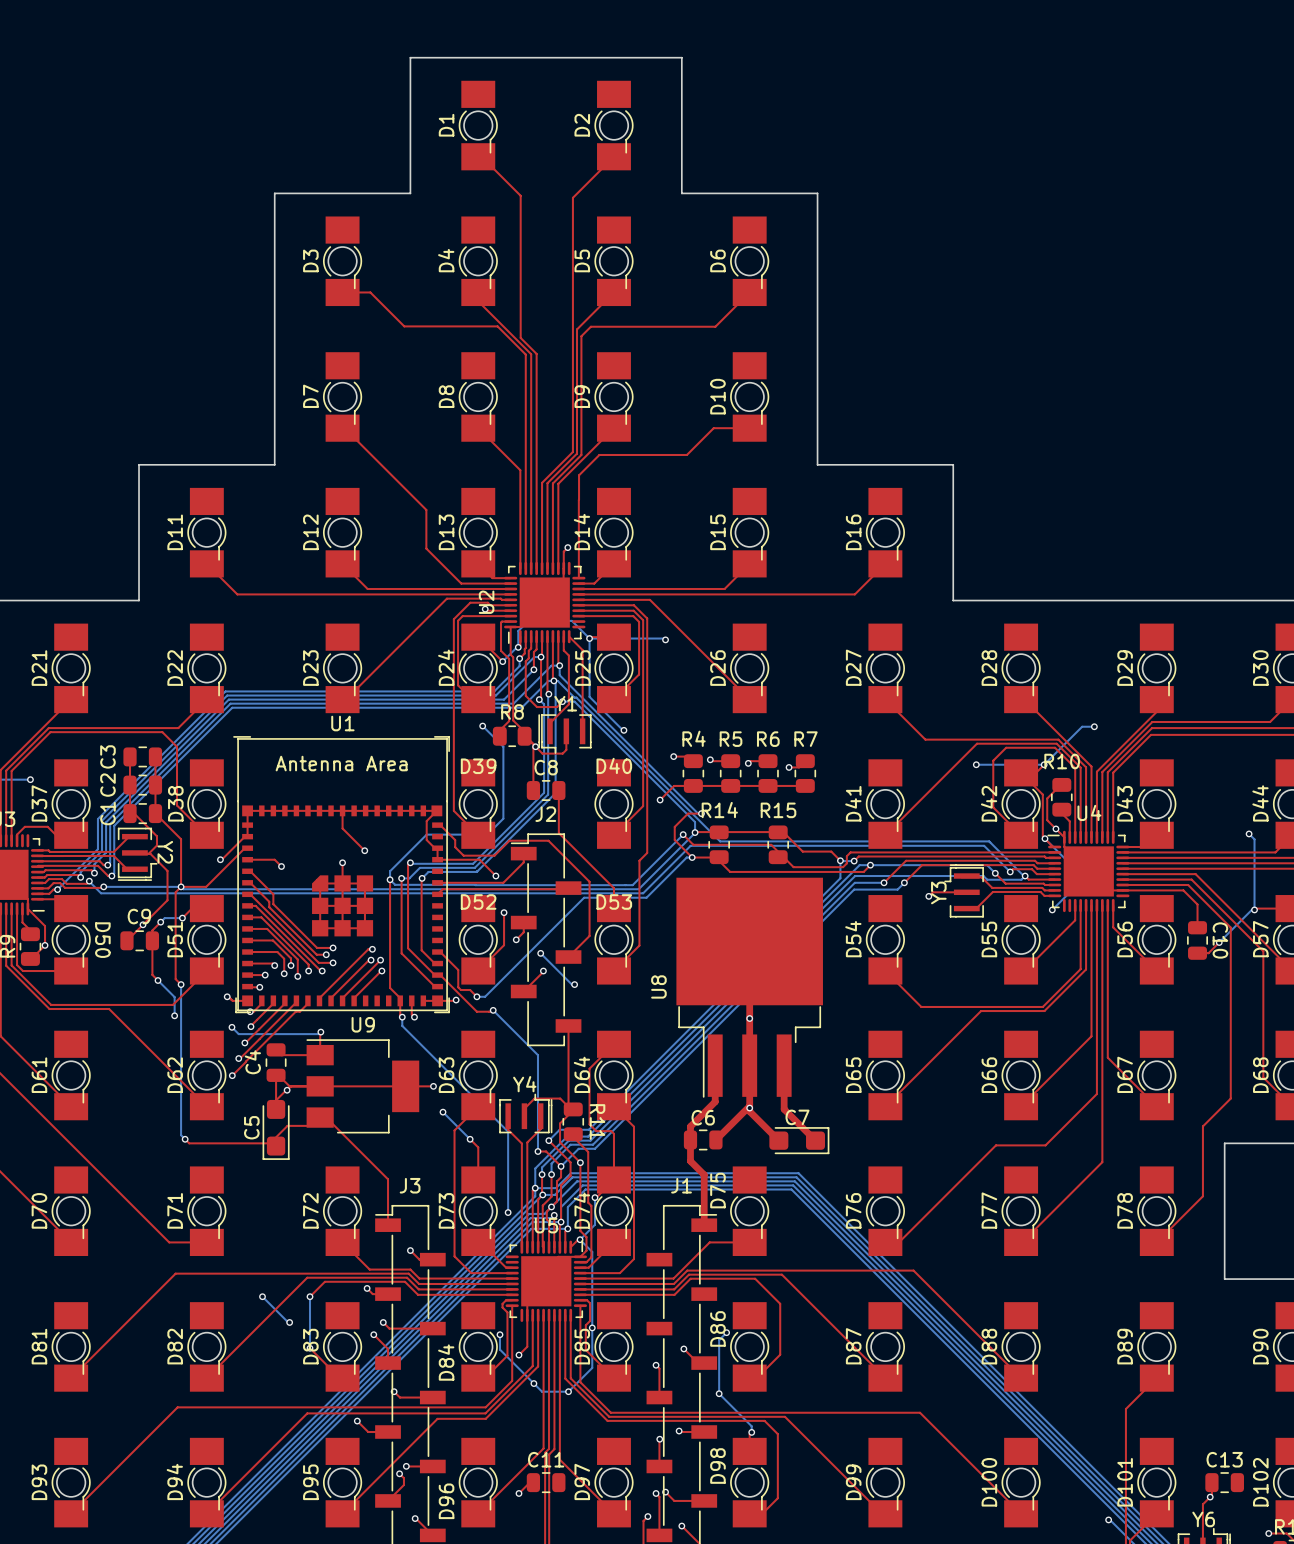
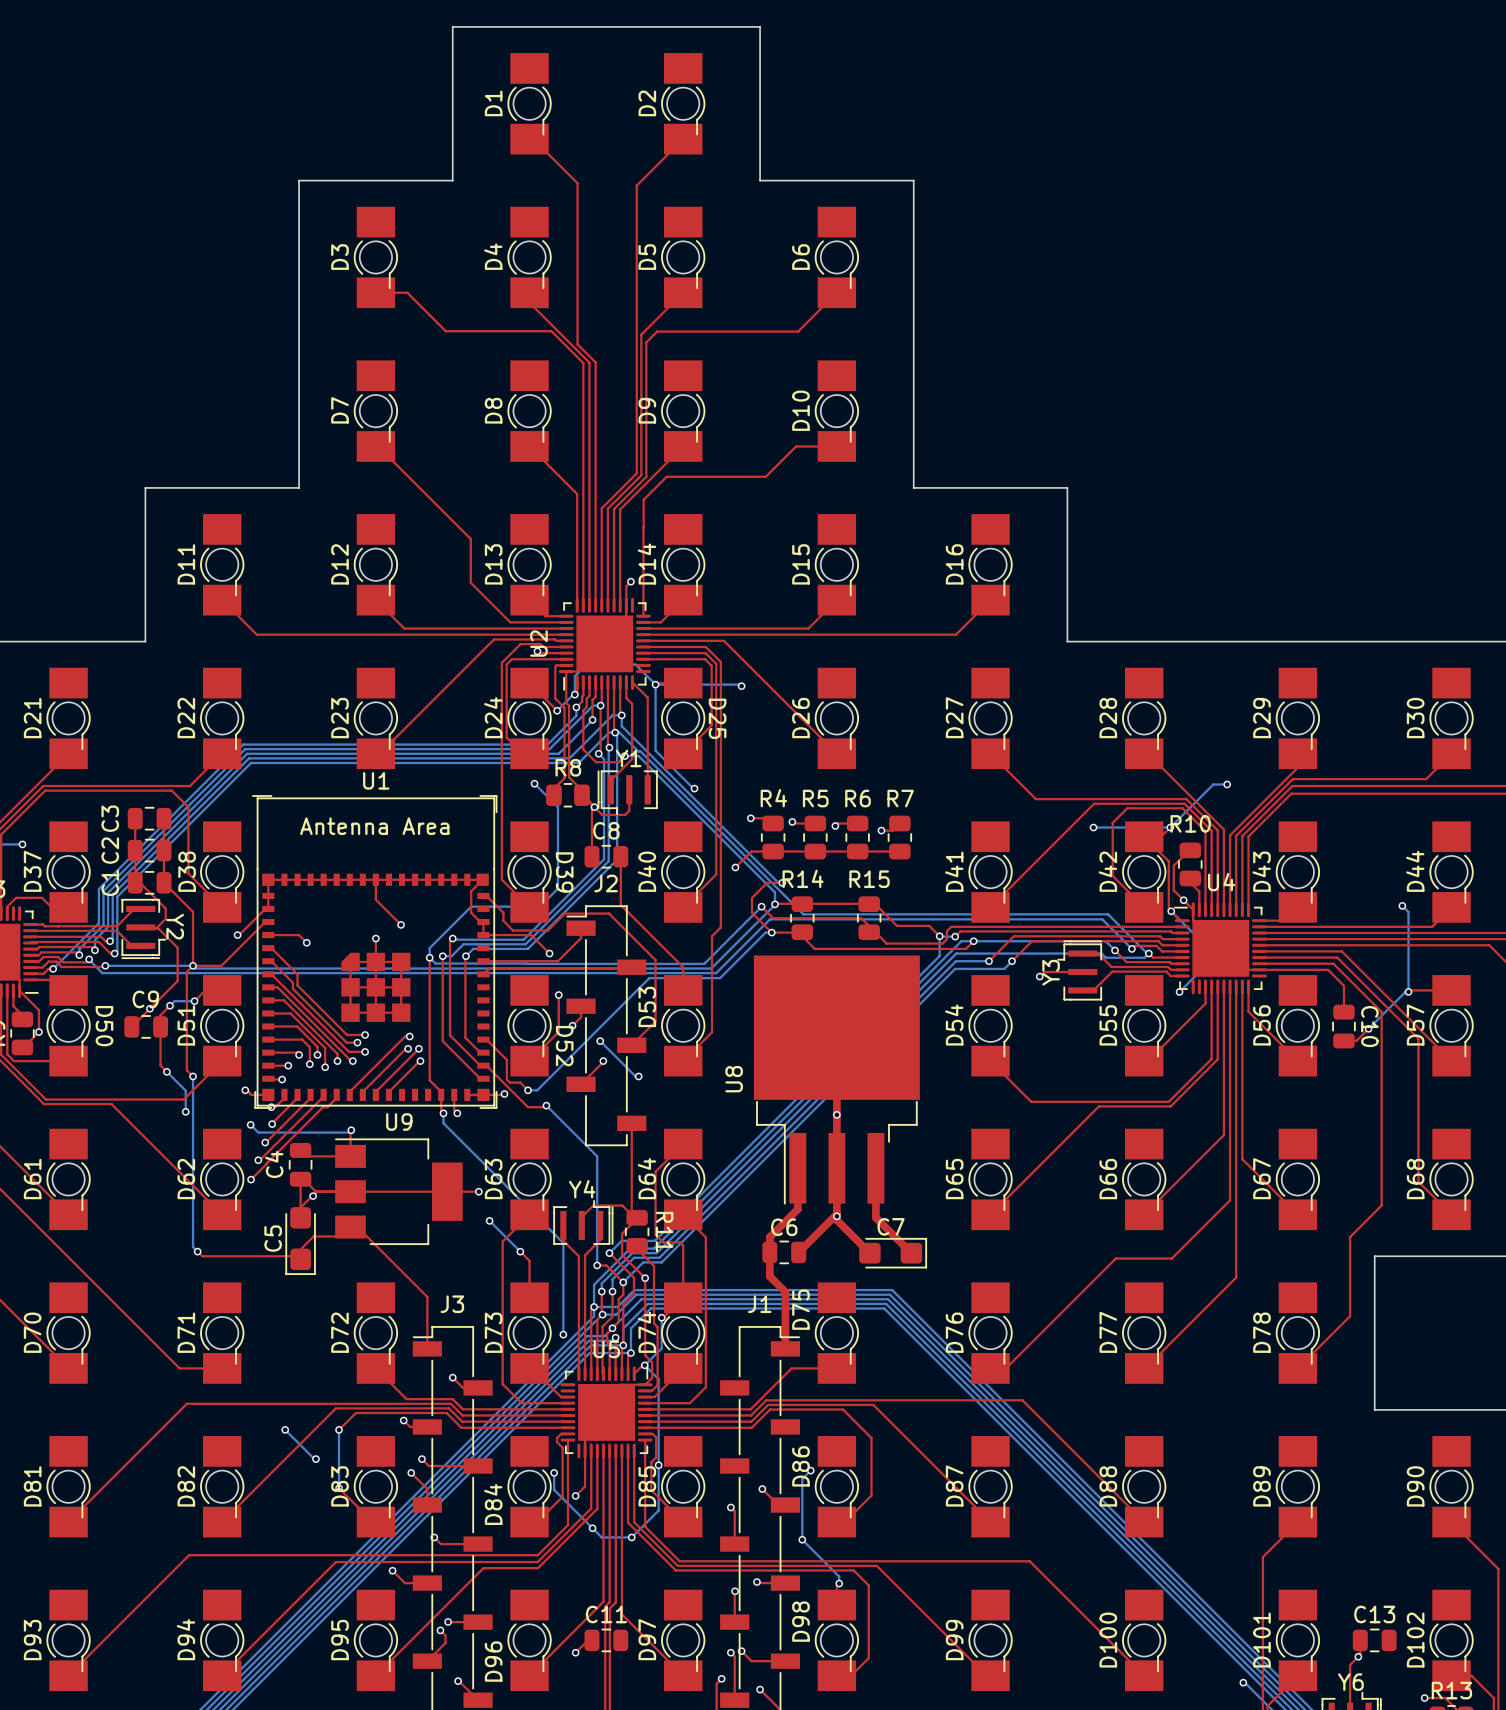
D25 name rotation: 0° (582, 668) -> 180° (717, 718)
D25 name position: D25 (582, 668) -> D25 (717, 718)
D40 name rotation: 0° (614, 765) -> 90° counterclockwise (646, 871)
D40 name position: D40 (614, 765) -> D40 (646, 871)
D39 name rotation: 0° (478, 766) -> 90° clockwise (564, 872)
D39 name position: D39 (478, 766) -> D39 (564, 872)
D52 name rotation: 0° (478, 901) -> 90° clockwise (564, 1046)
D52 name position: D52 (478, 901) -> D52 (564, 1046)
D53 name rotation: 0° (614, 901) -> 90° counterclockwise (647, 1006)

